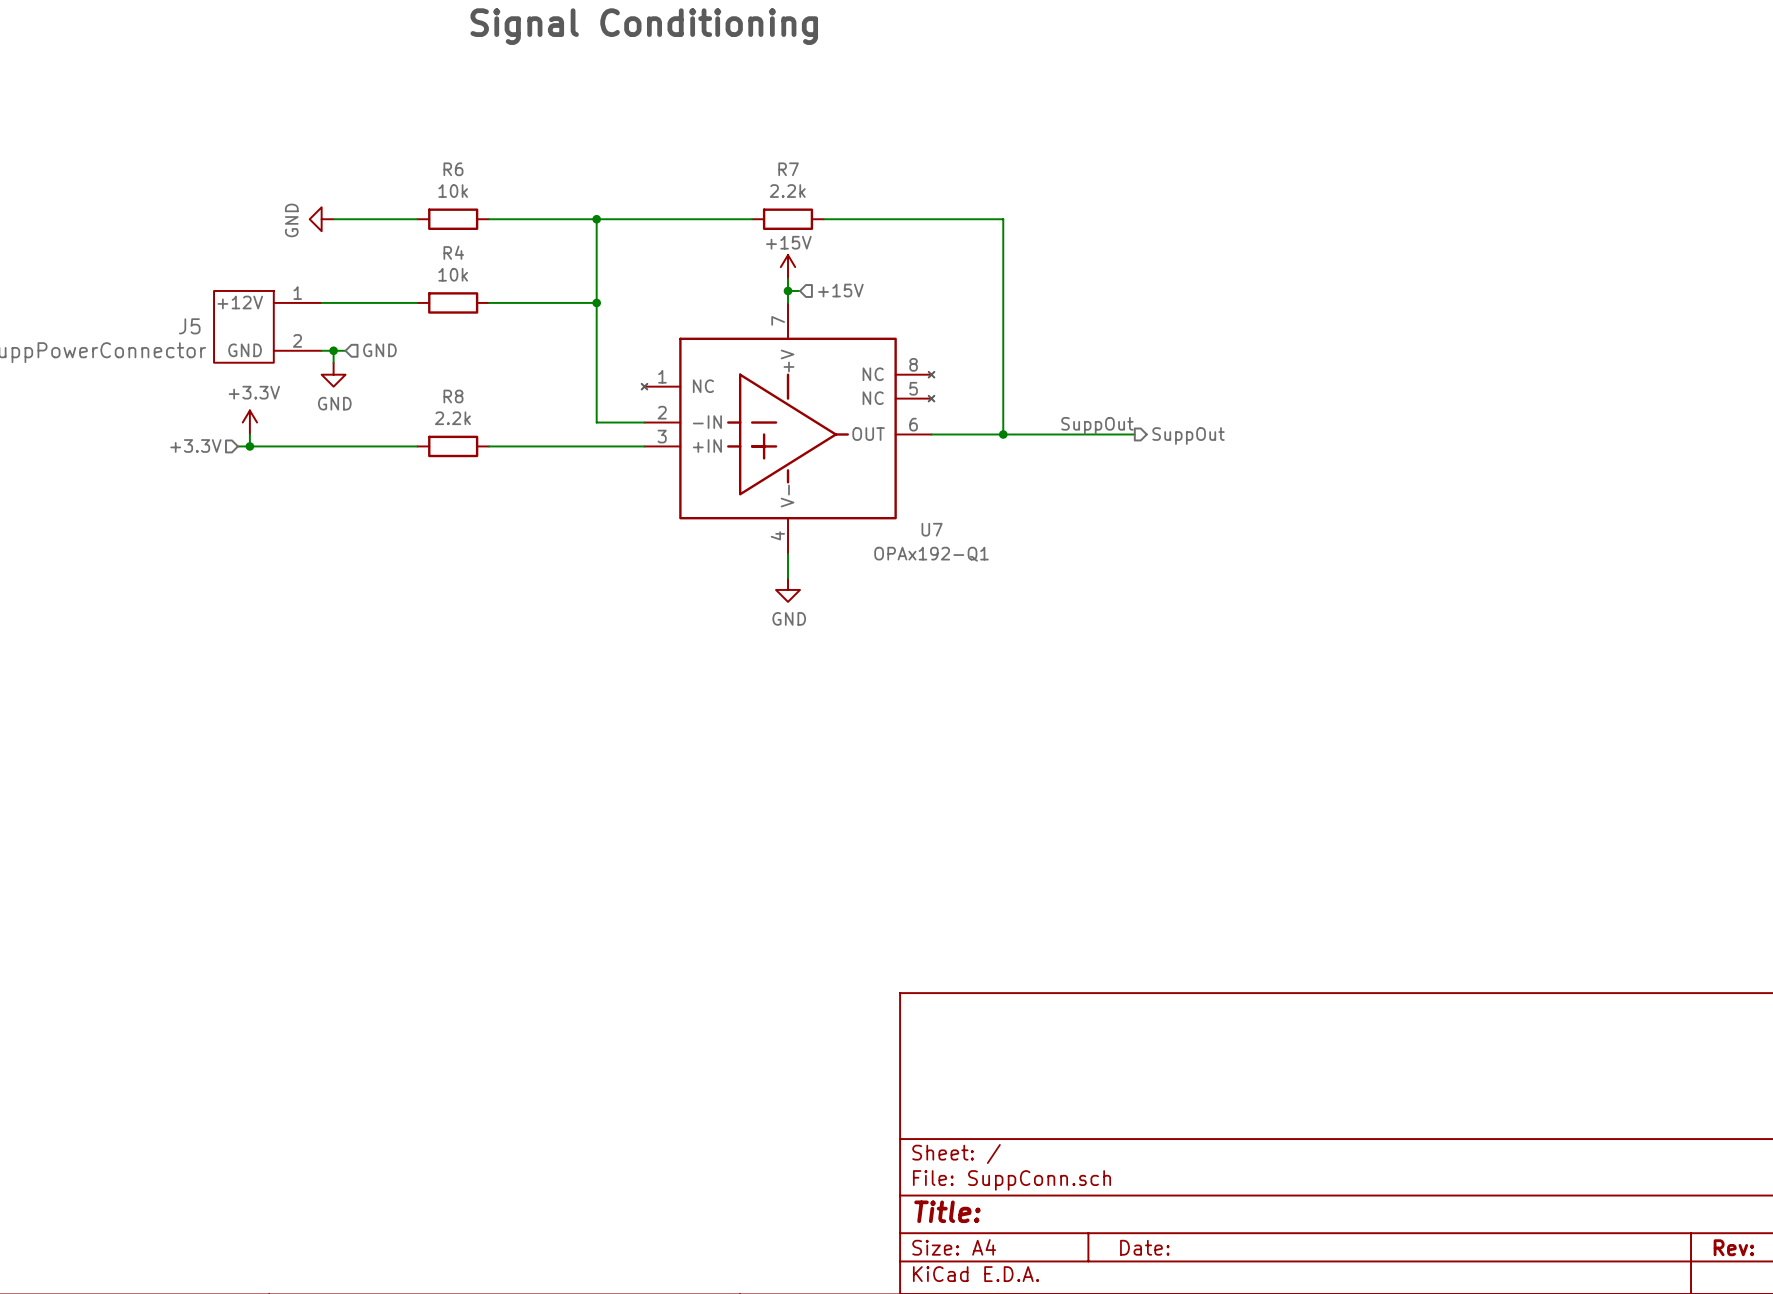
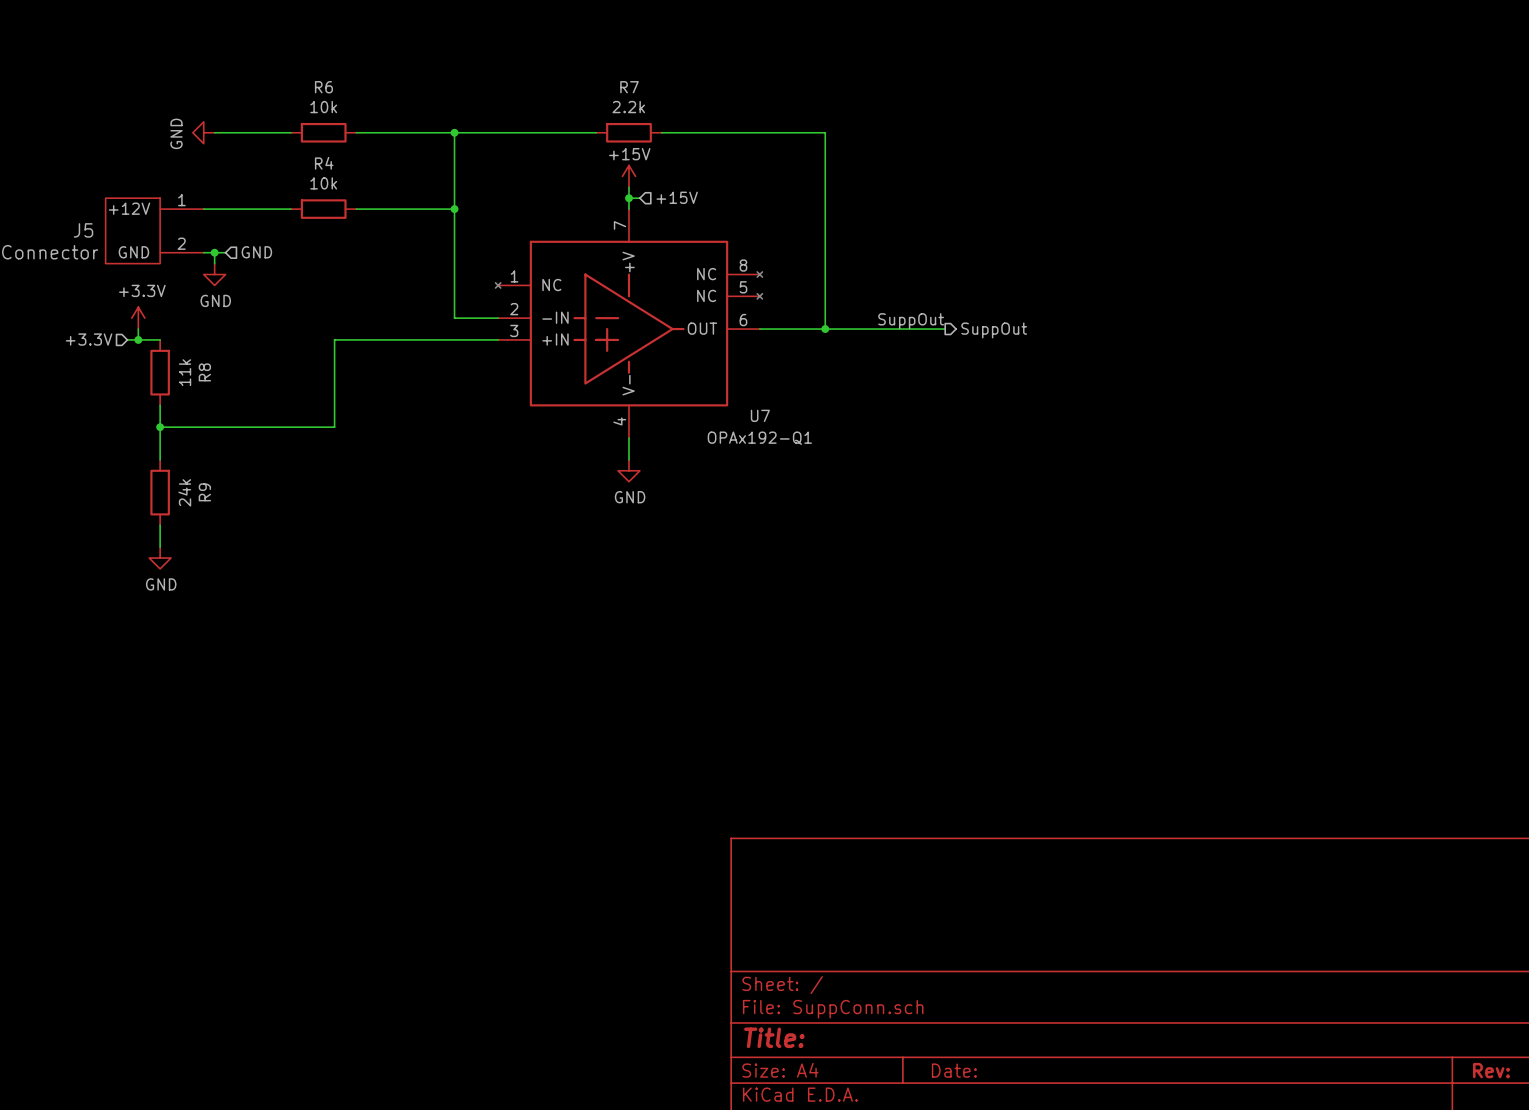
R8 value: 2.2k (452, 418) -> 11k (185, 372)
wire: (273, 446) (417, 446) -> none
R8 rotation: 0° (453, 446) -> 90° clockwise (160, 372)
R8 position: (453, 446) -> (160, 372)
wire: none -> (356, 339) (334, 339) (334, 427) (160, 427)
wire: none -> (160, 405) (160, 459)
junction: none -> (160, 427)
R9: none -> 24k (160, 492)
wire: none -> (160, 525) (160, 547)
power symbol: none -> GND (160, 558)

